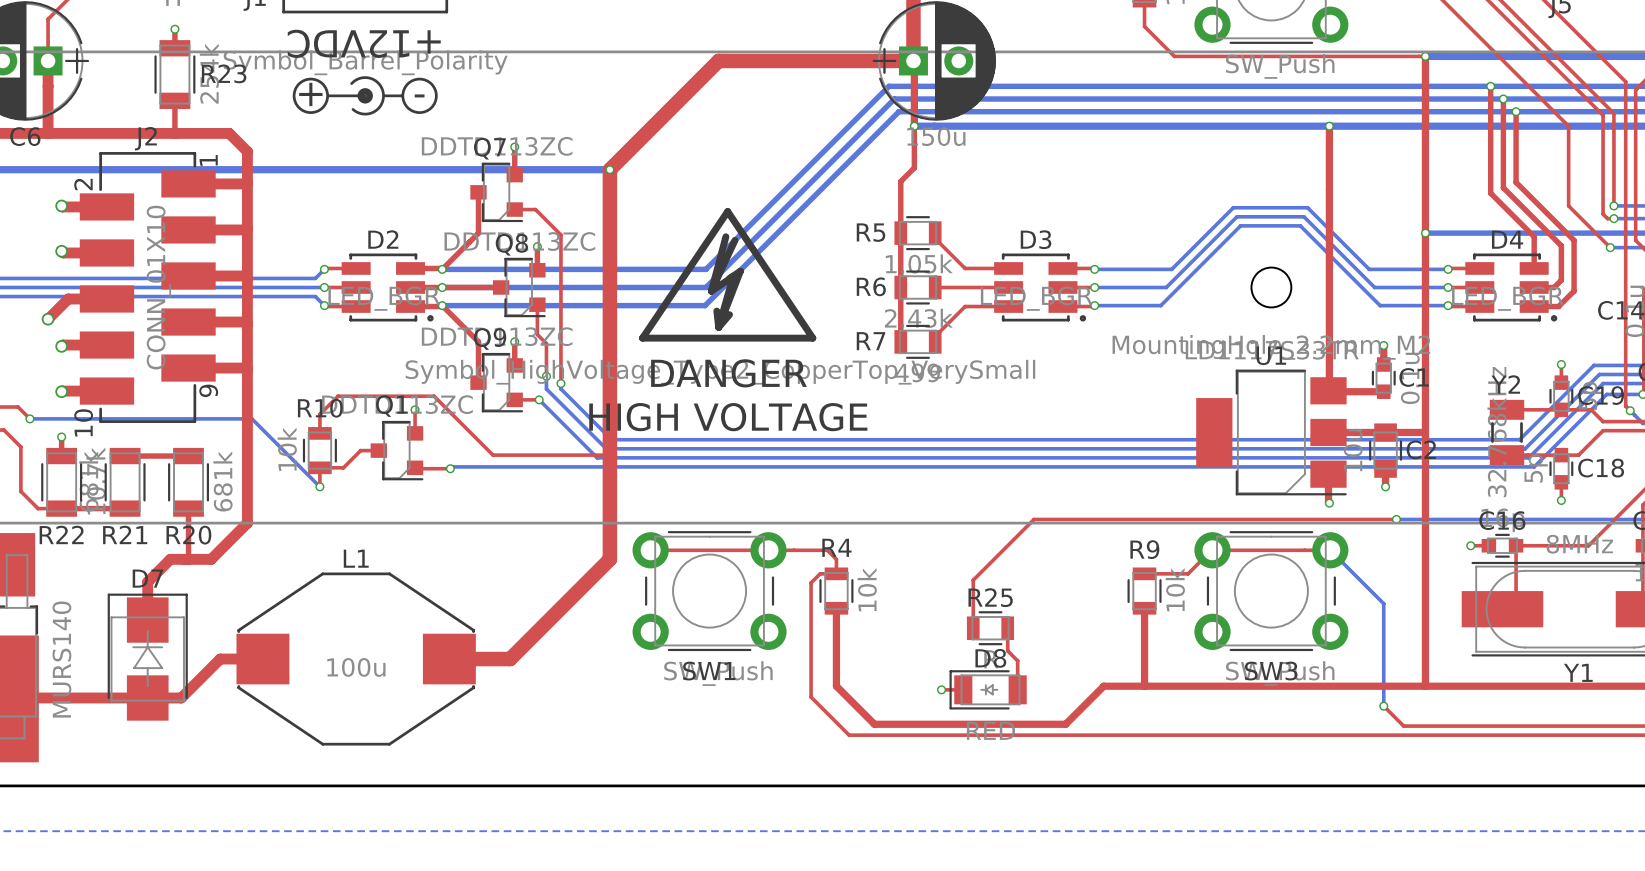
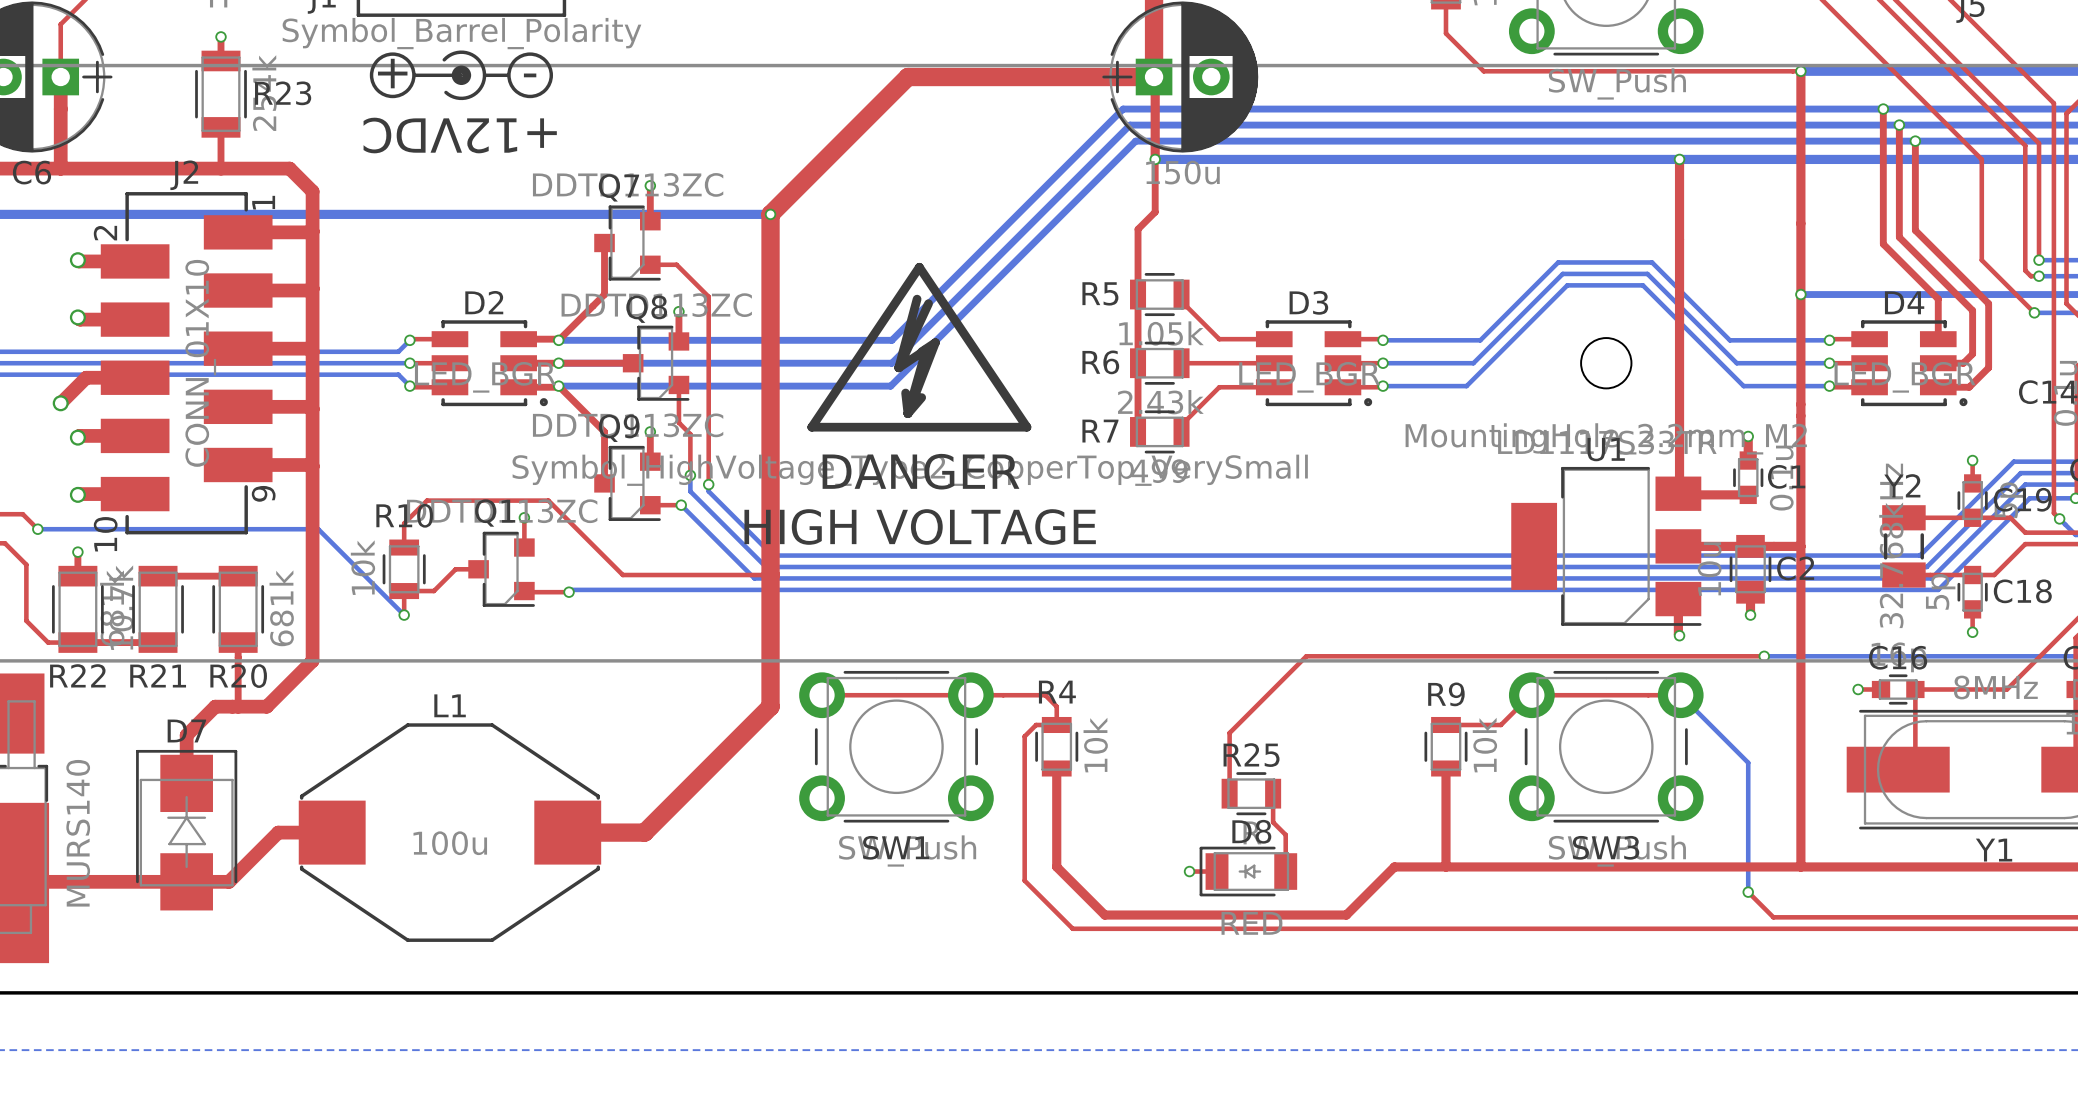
text position: +12VDC (364, 43) -> +12VDC (460, 135)
text position: + (310, 94) -> + (392, 73)
drawing position: (365, 95) -> (461, 75)
text position: - (419, 95) -> - (530, 75)

